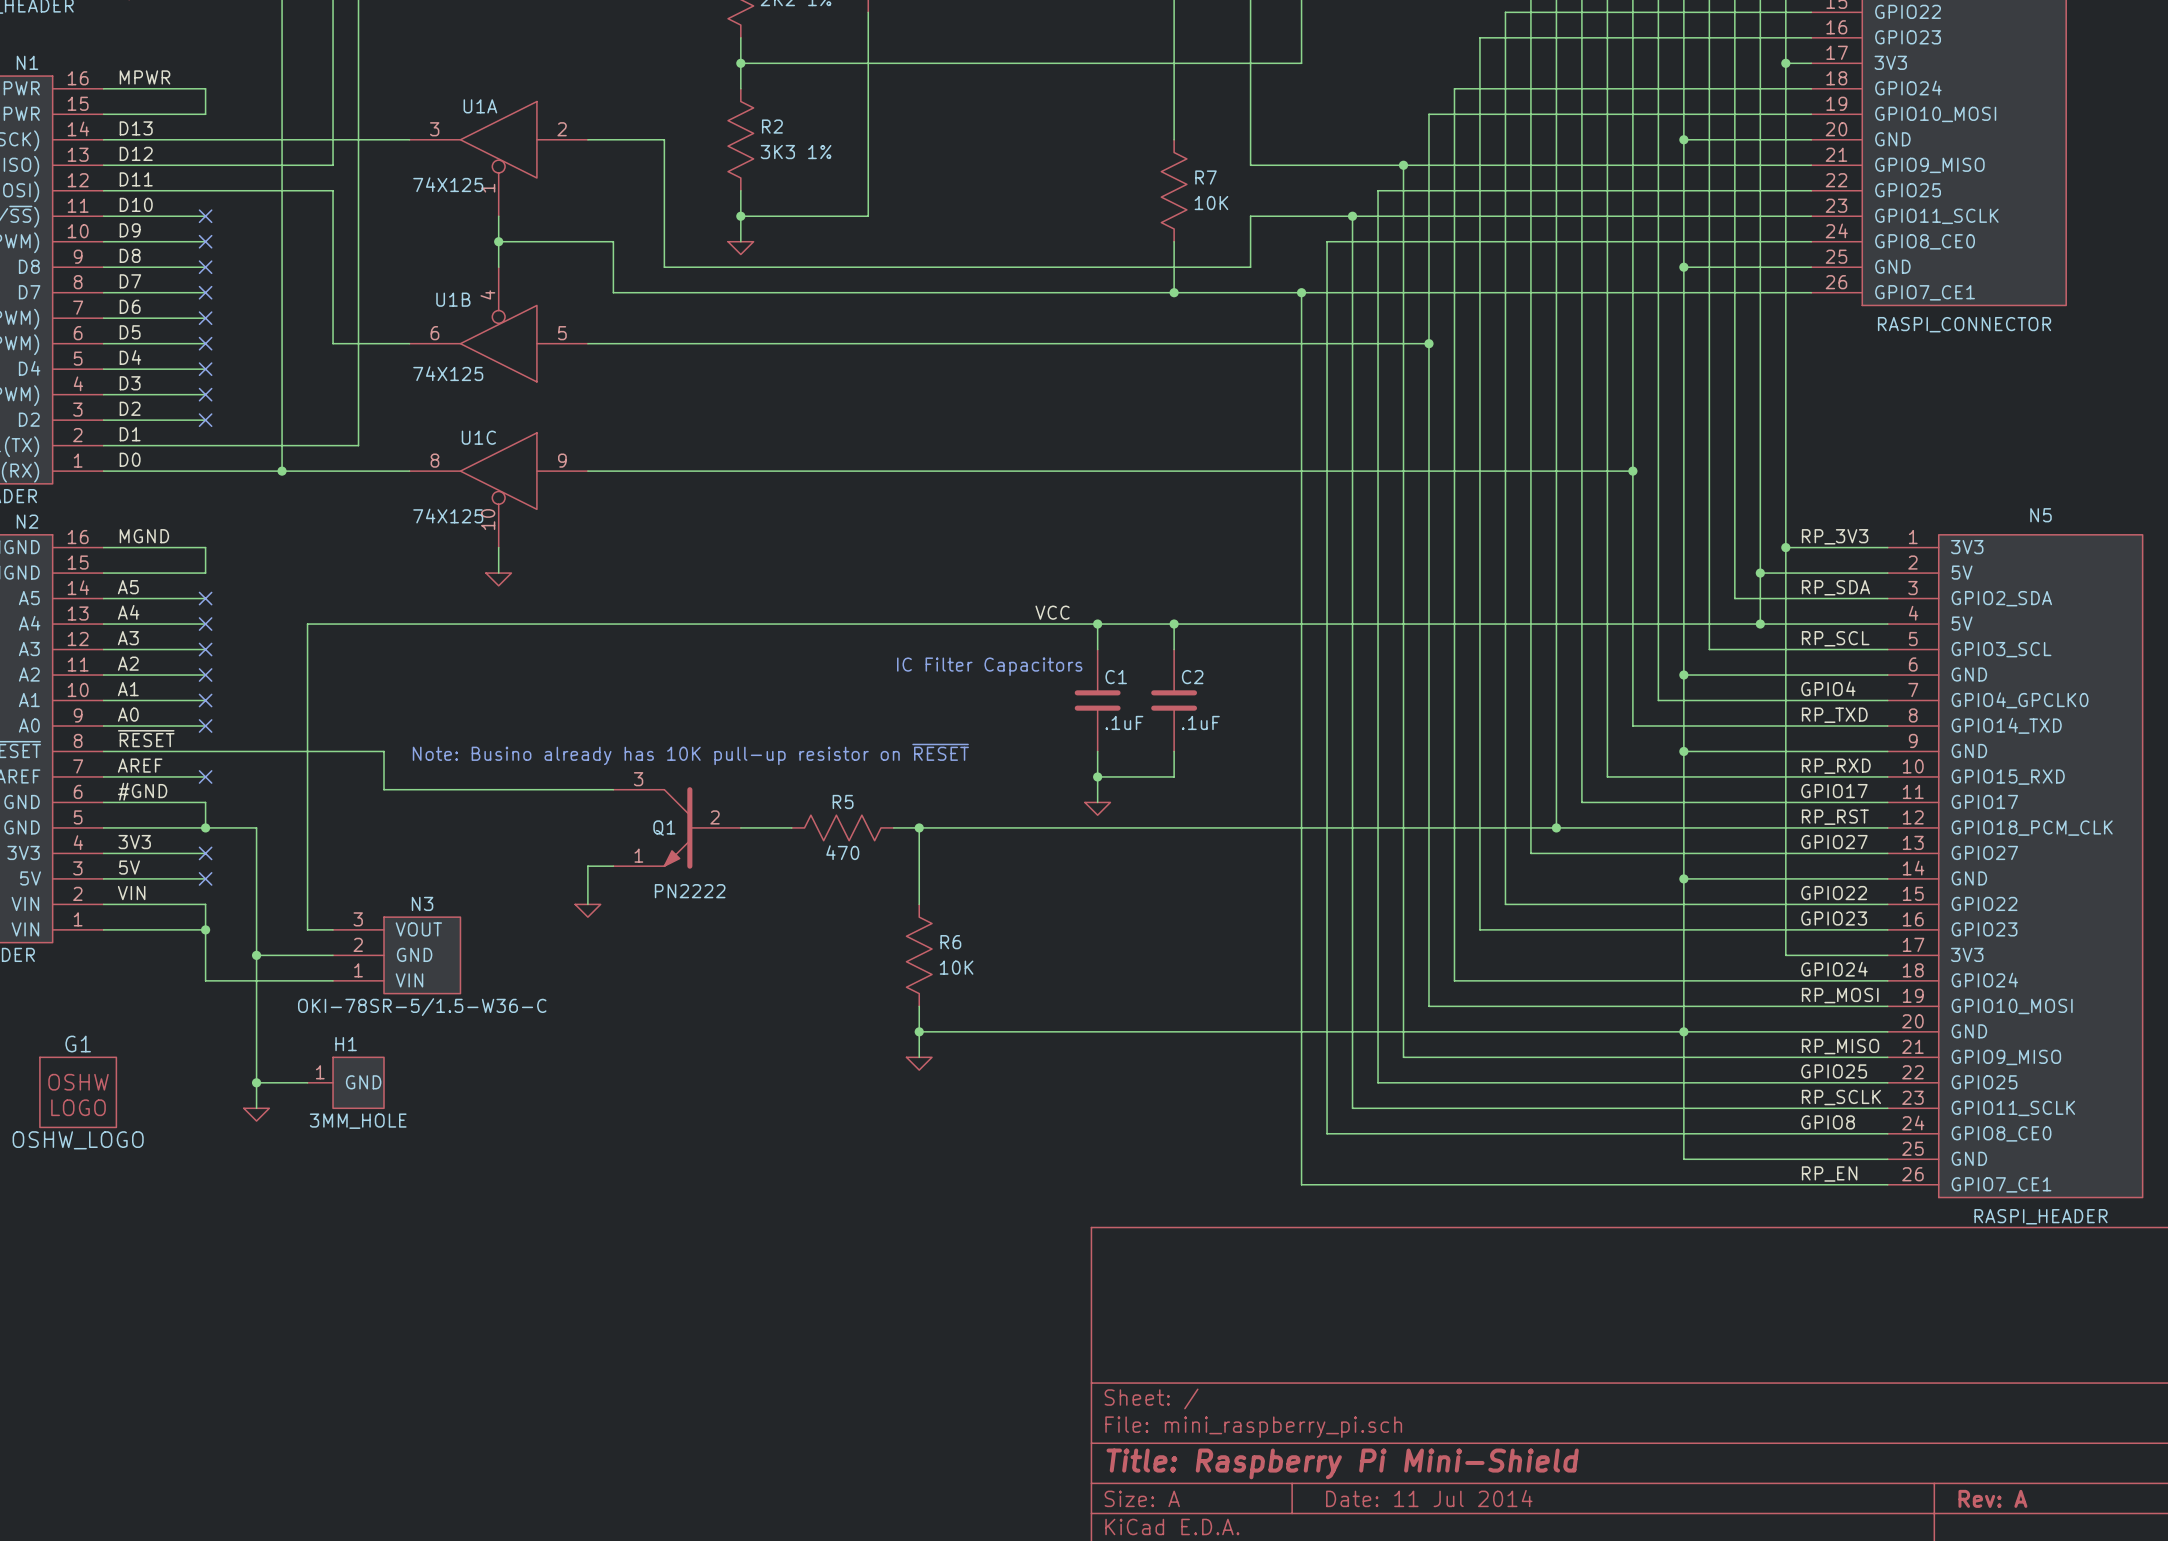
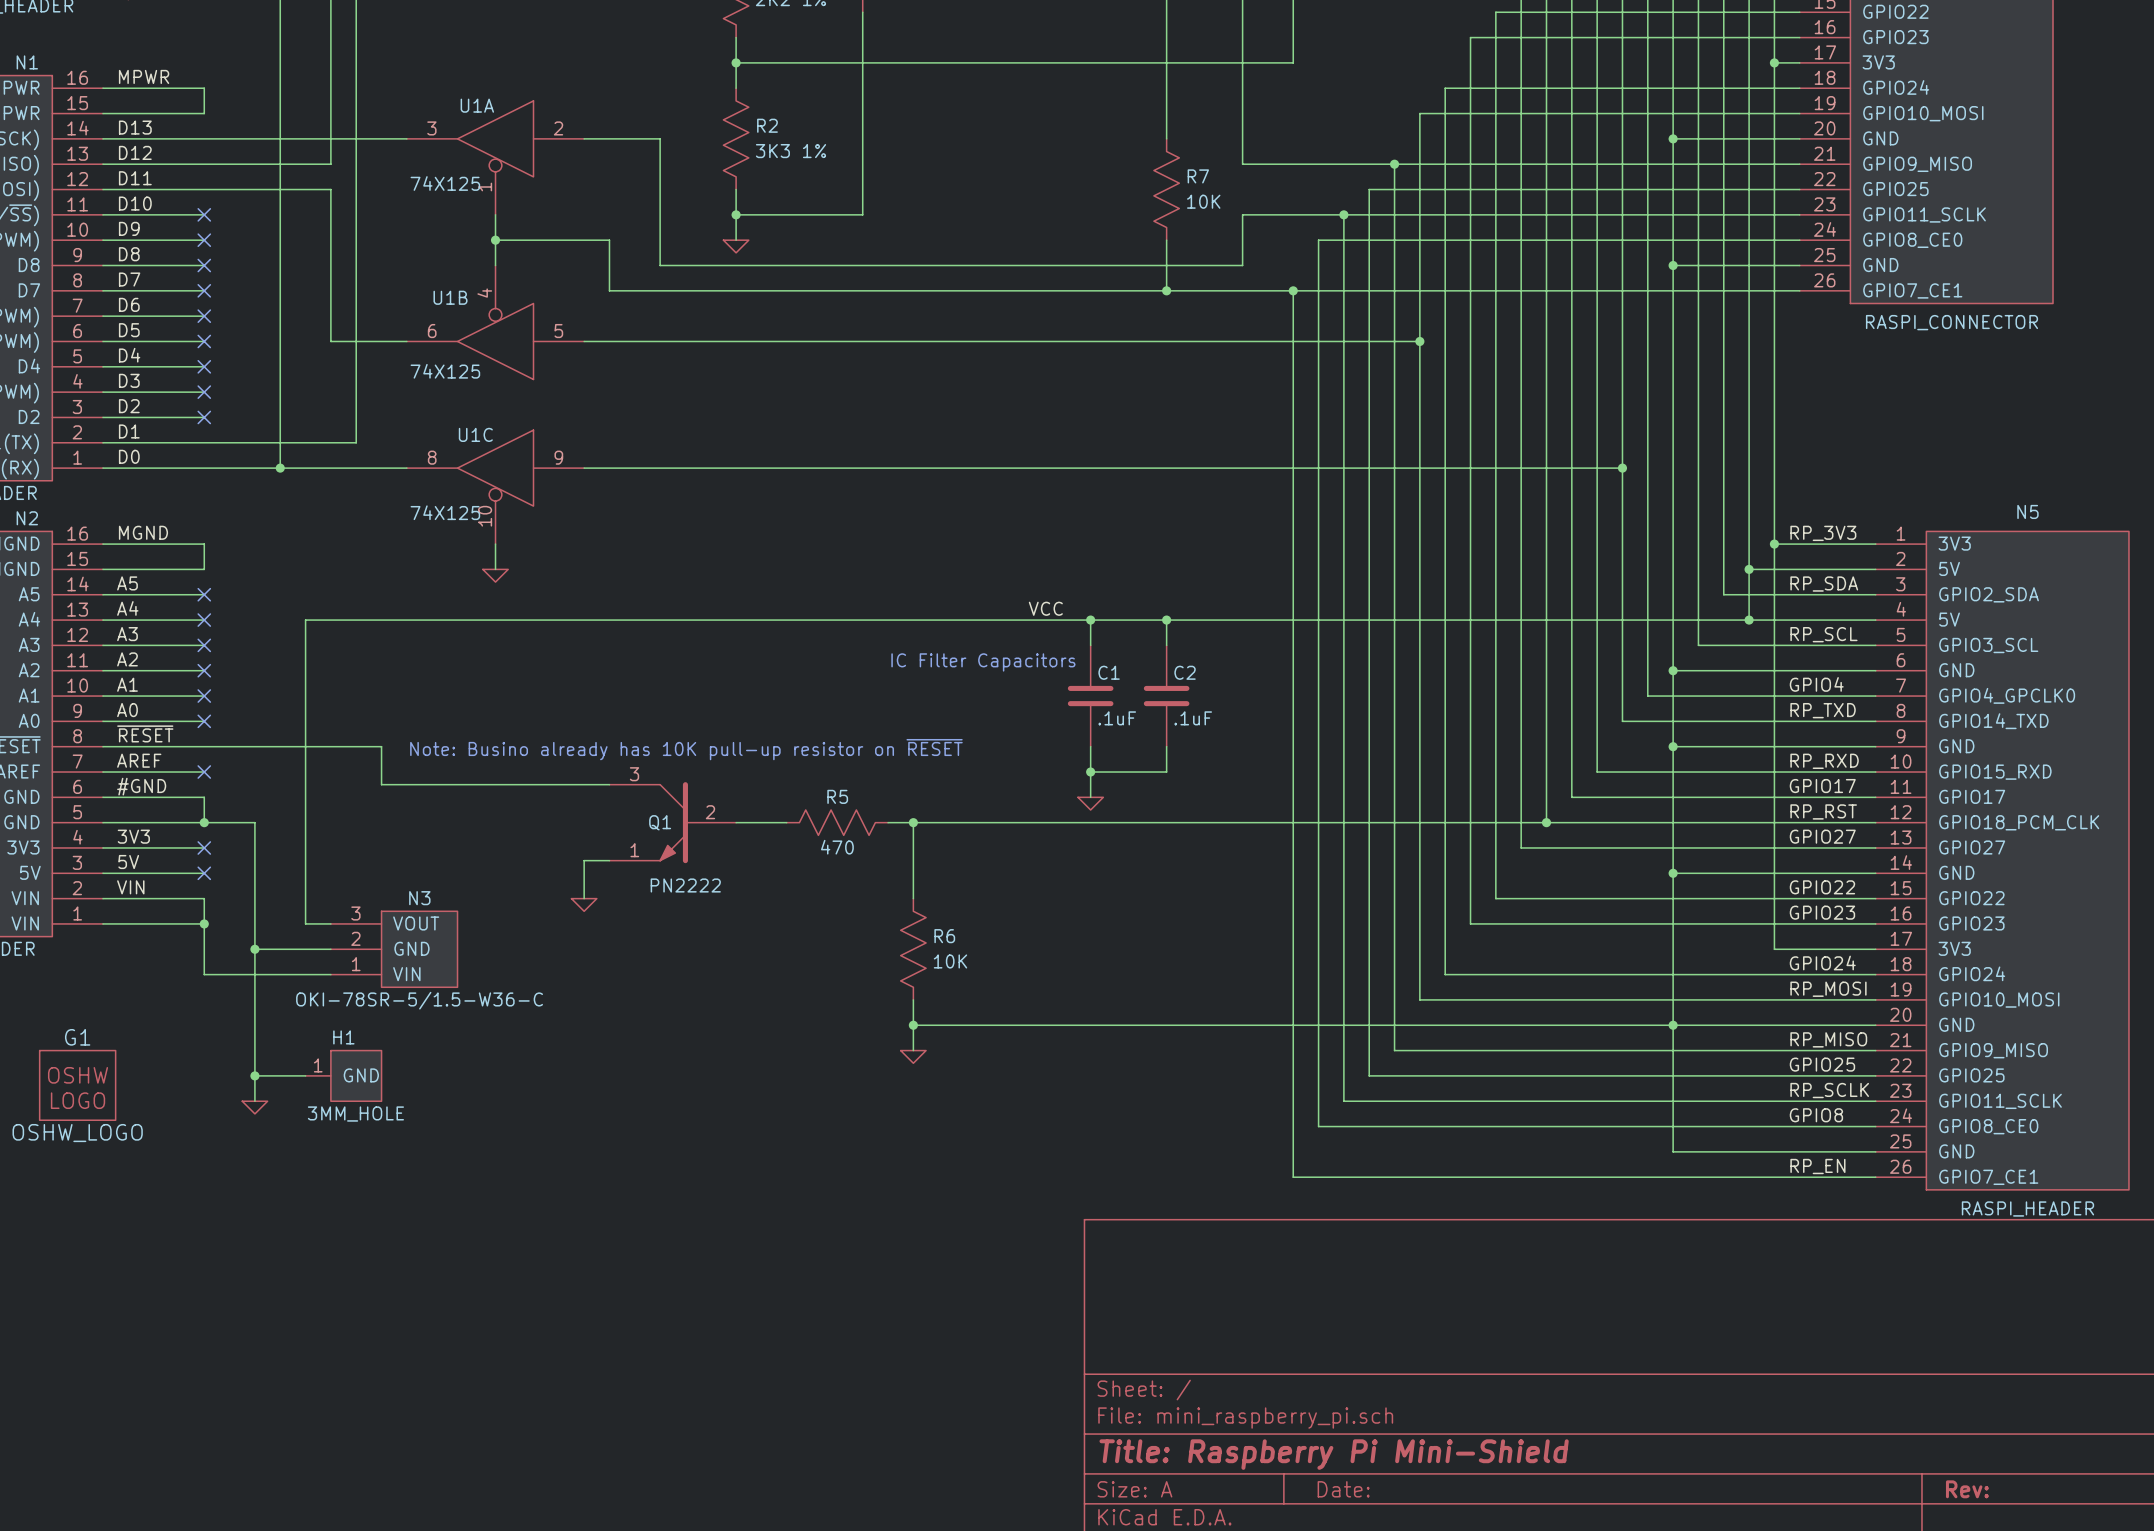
title block: Date: 11 Jul 2014 (1429, 1498) -> Date: (1343, 1489)
title block: Rev: A (1992, 1498) -> Rev: (1967, 1489)

